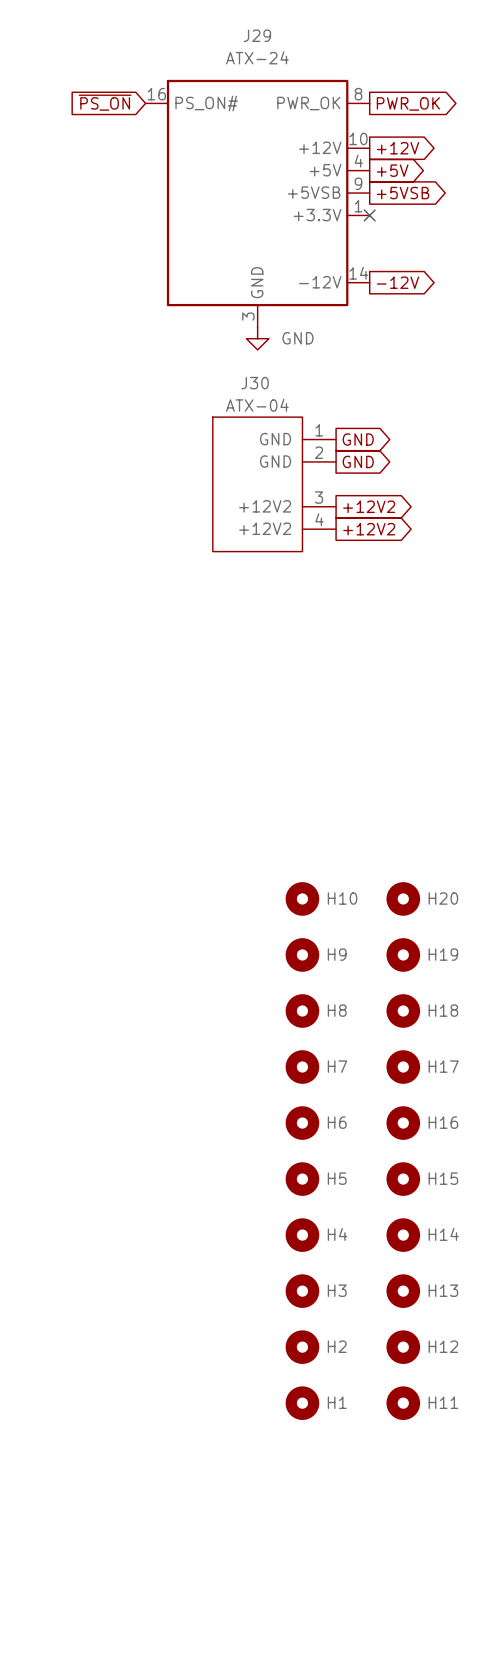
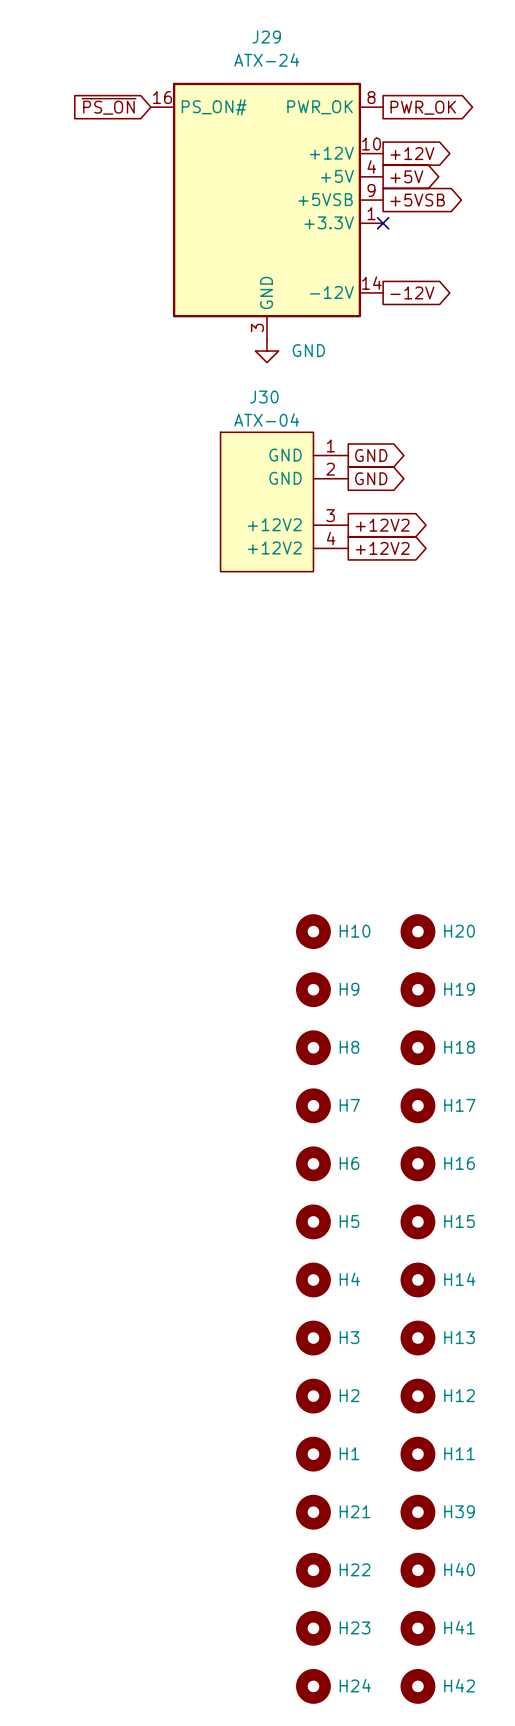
H21: none -> (313, 1512)
H39: none -> (417, 1512)
H22: none -> (313, 1570)
H40: none -> (417, 1570)
H23: none -> (313, 1628)
H41: none -> (417, 1628)
H24: none -> (313, 1686)
H42: none -> (417, 1686)

